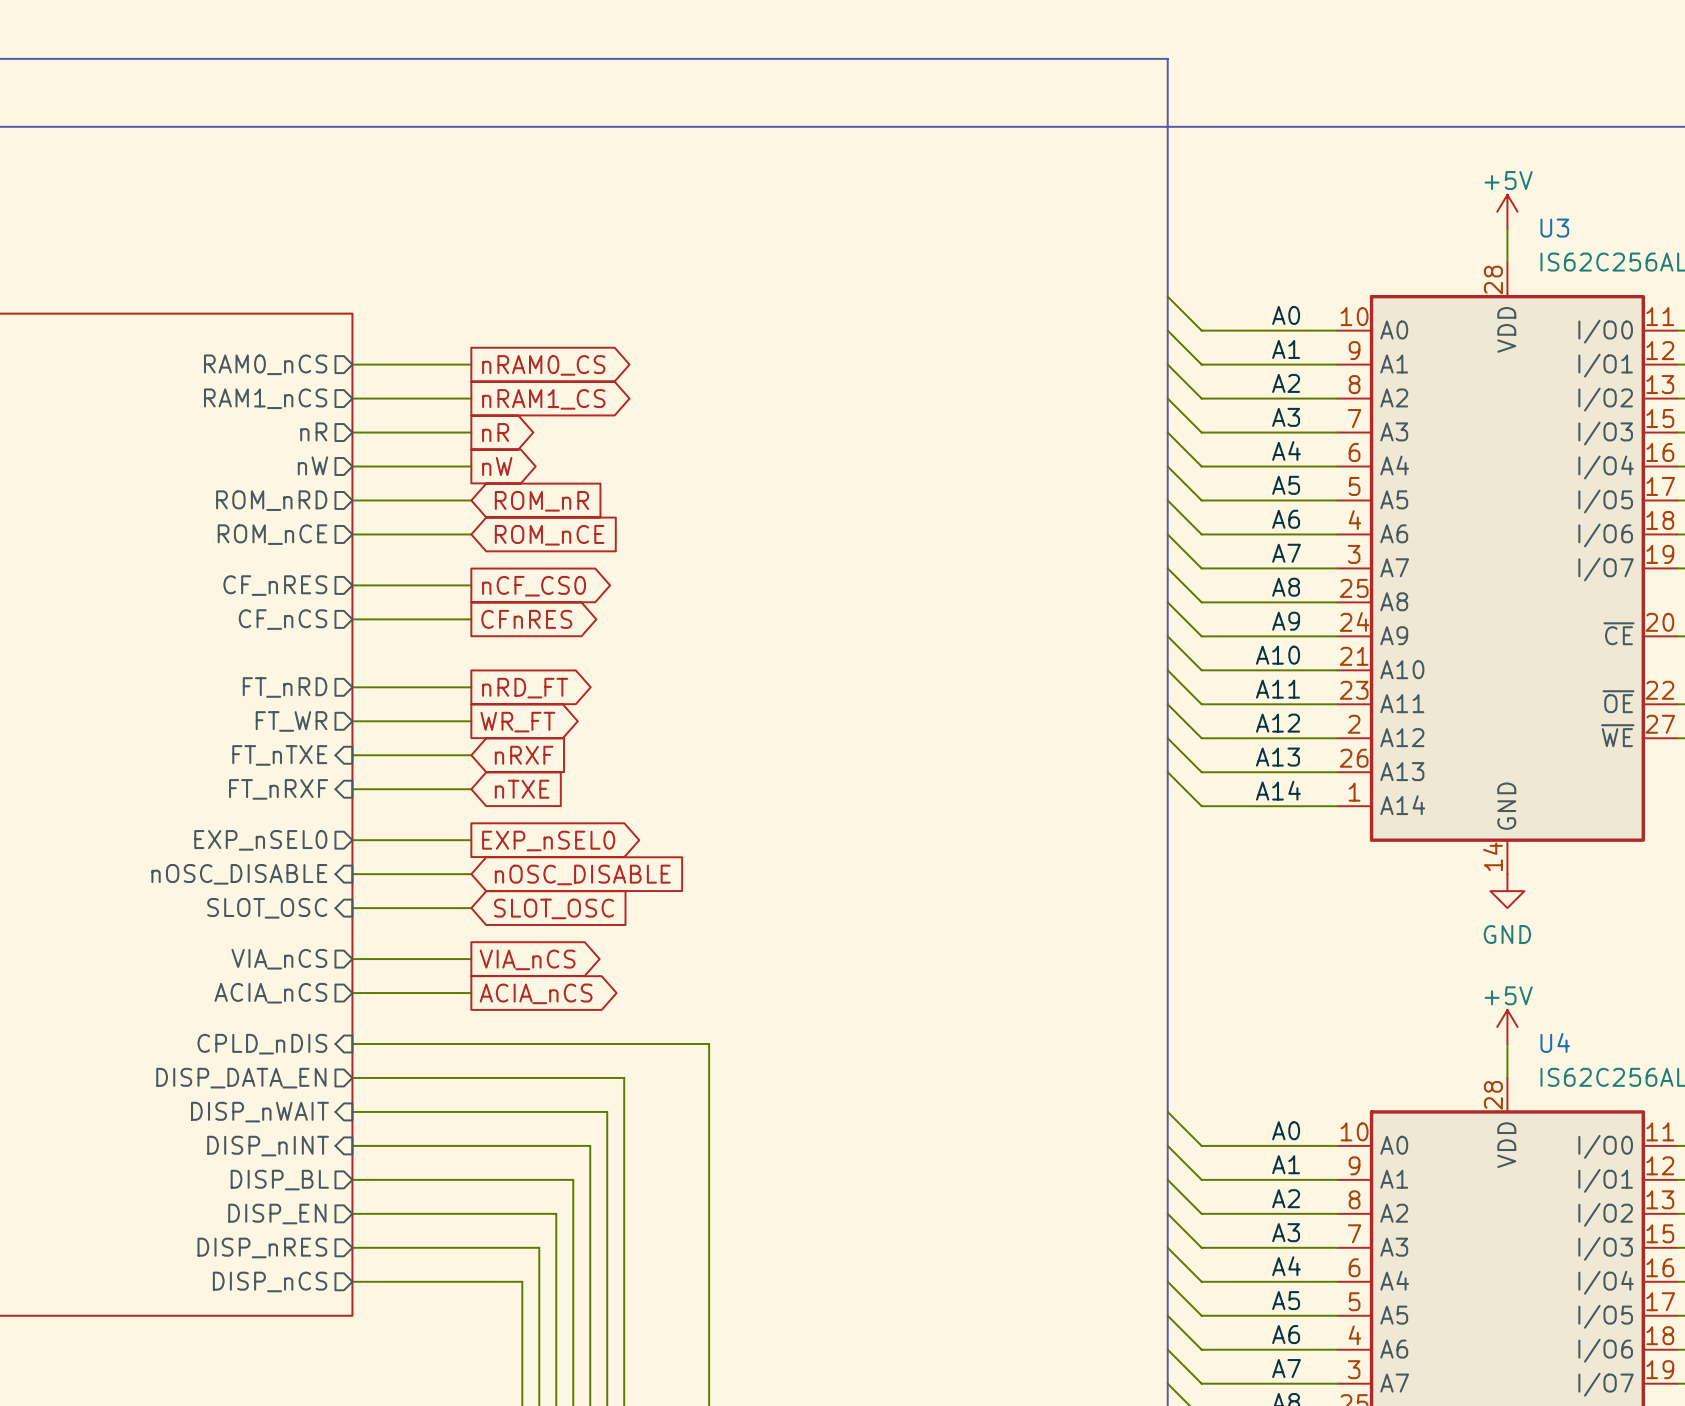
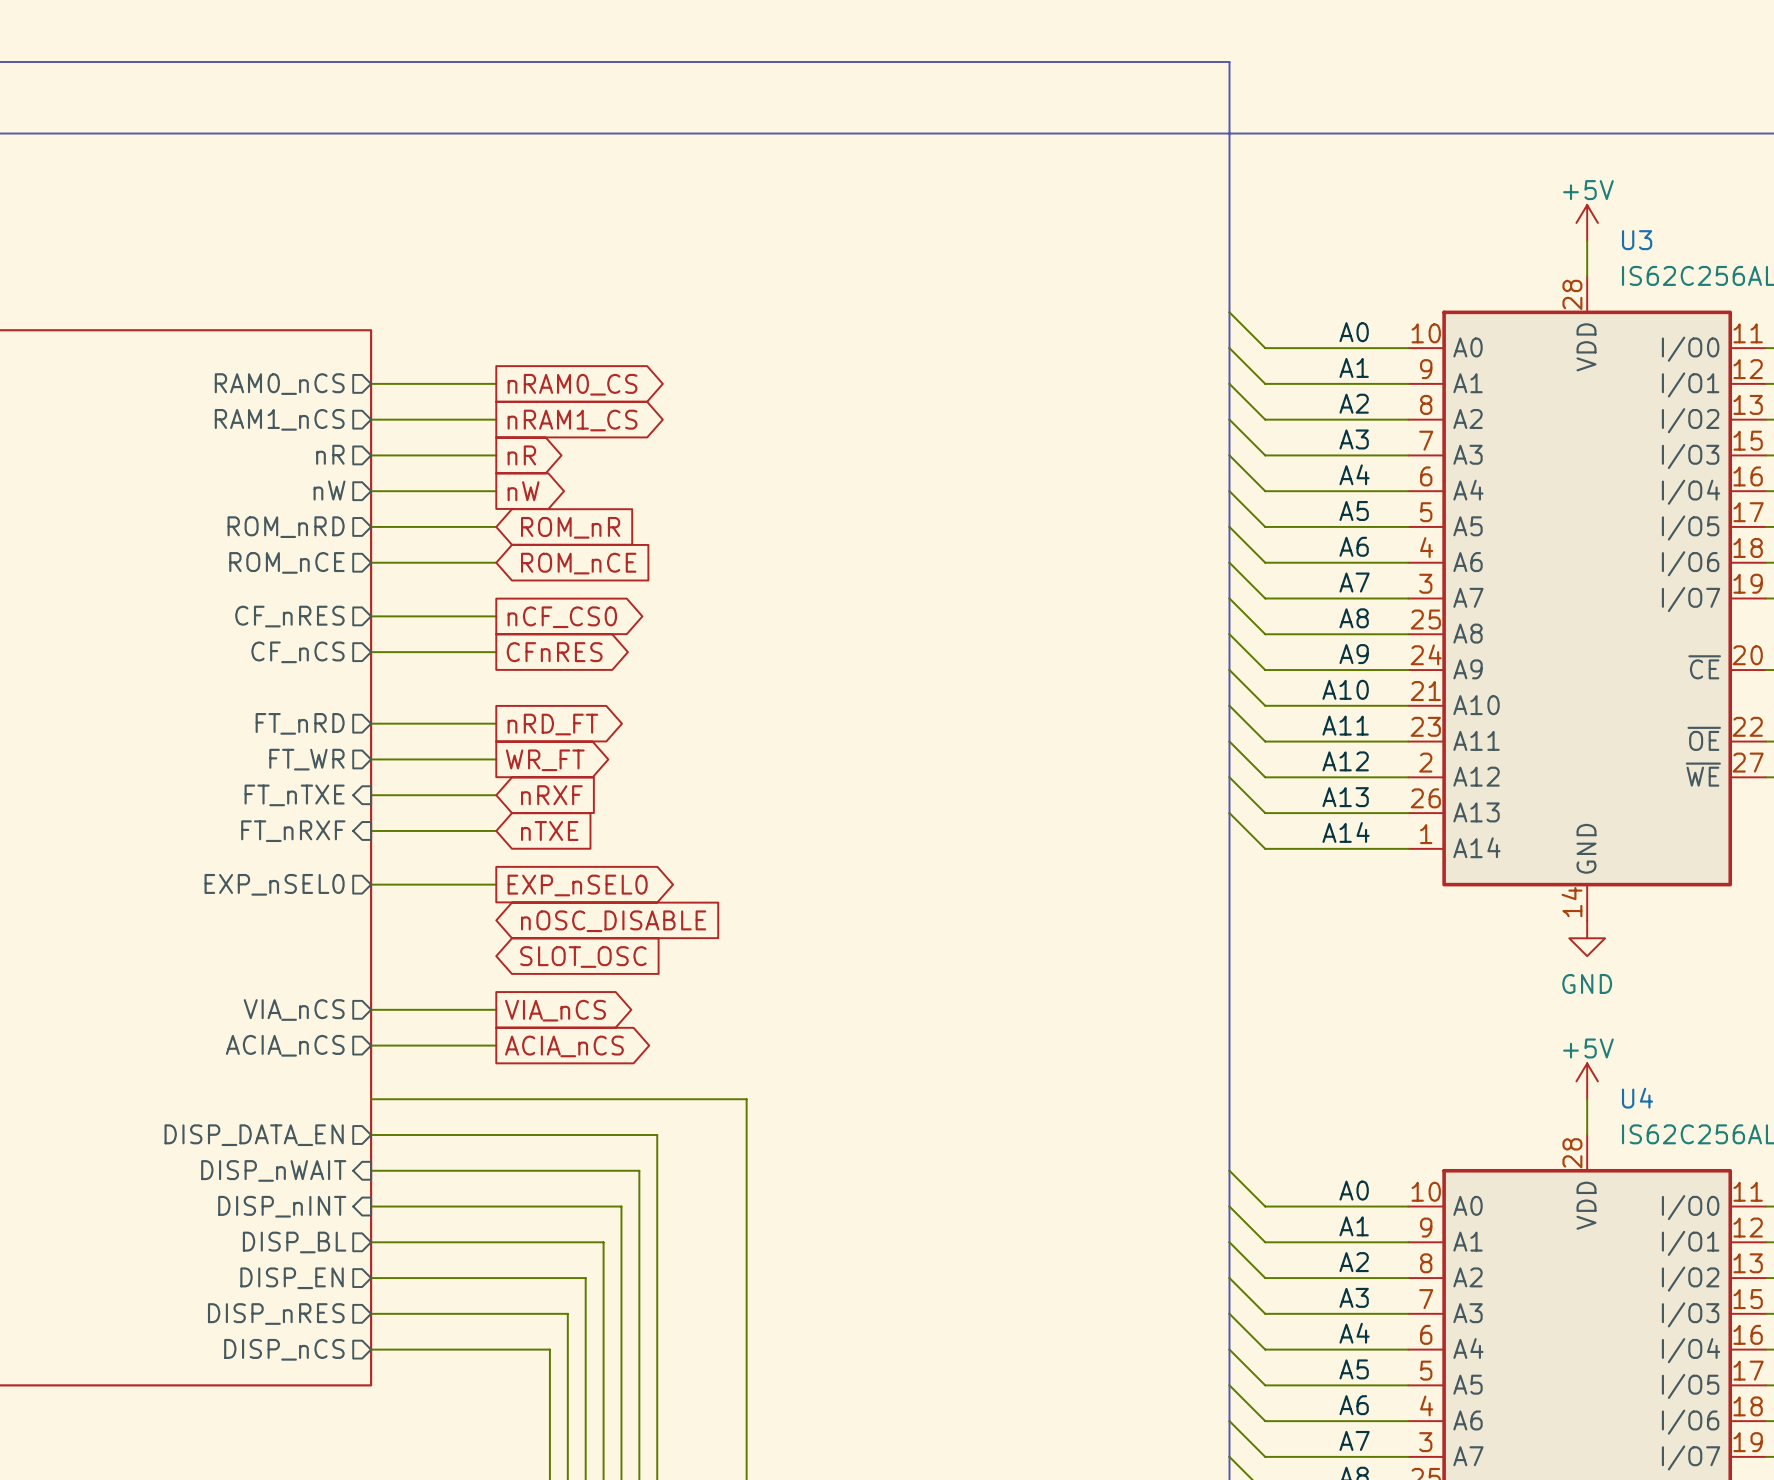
sheet pin: nOSC_DISABLE (239, 874) -> none
wire: (352, 874) (471, 874) -> none
sheet pin: SLOT_OSC (267, 908) -> none
wire: (352, 908) (471, 908) -> none
sheet pin: CPLD_nDIS (262, 1044) -> none

